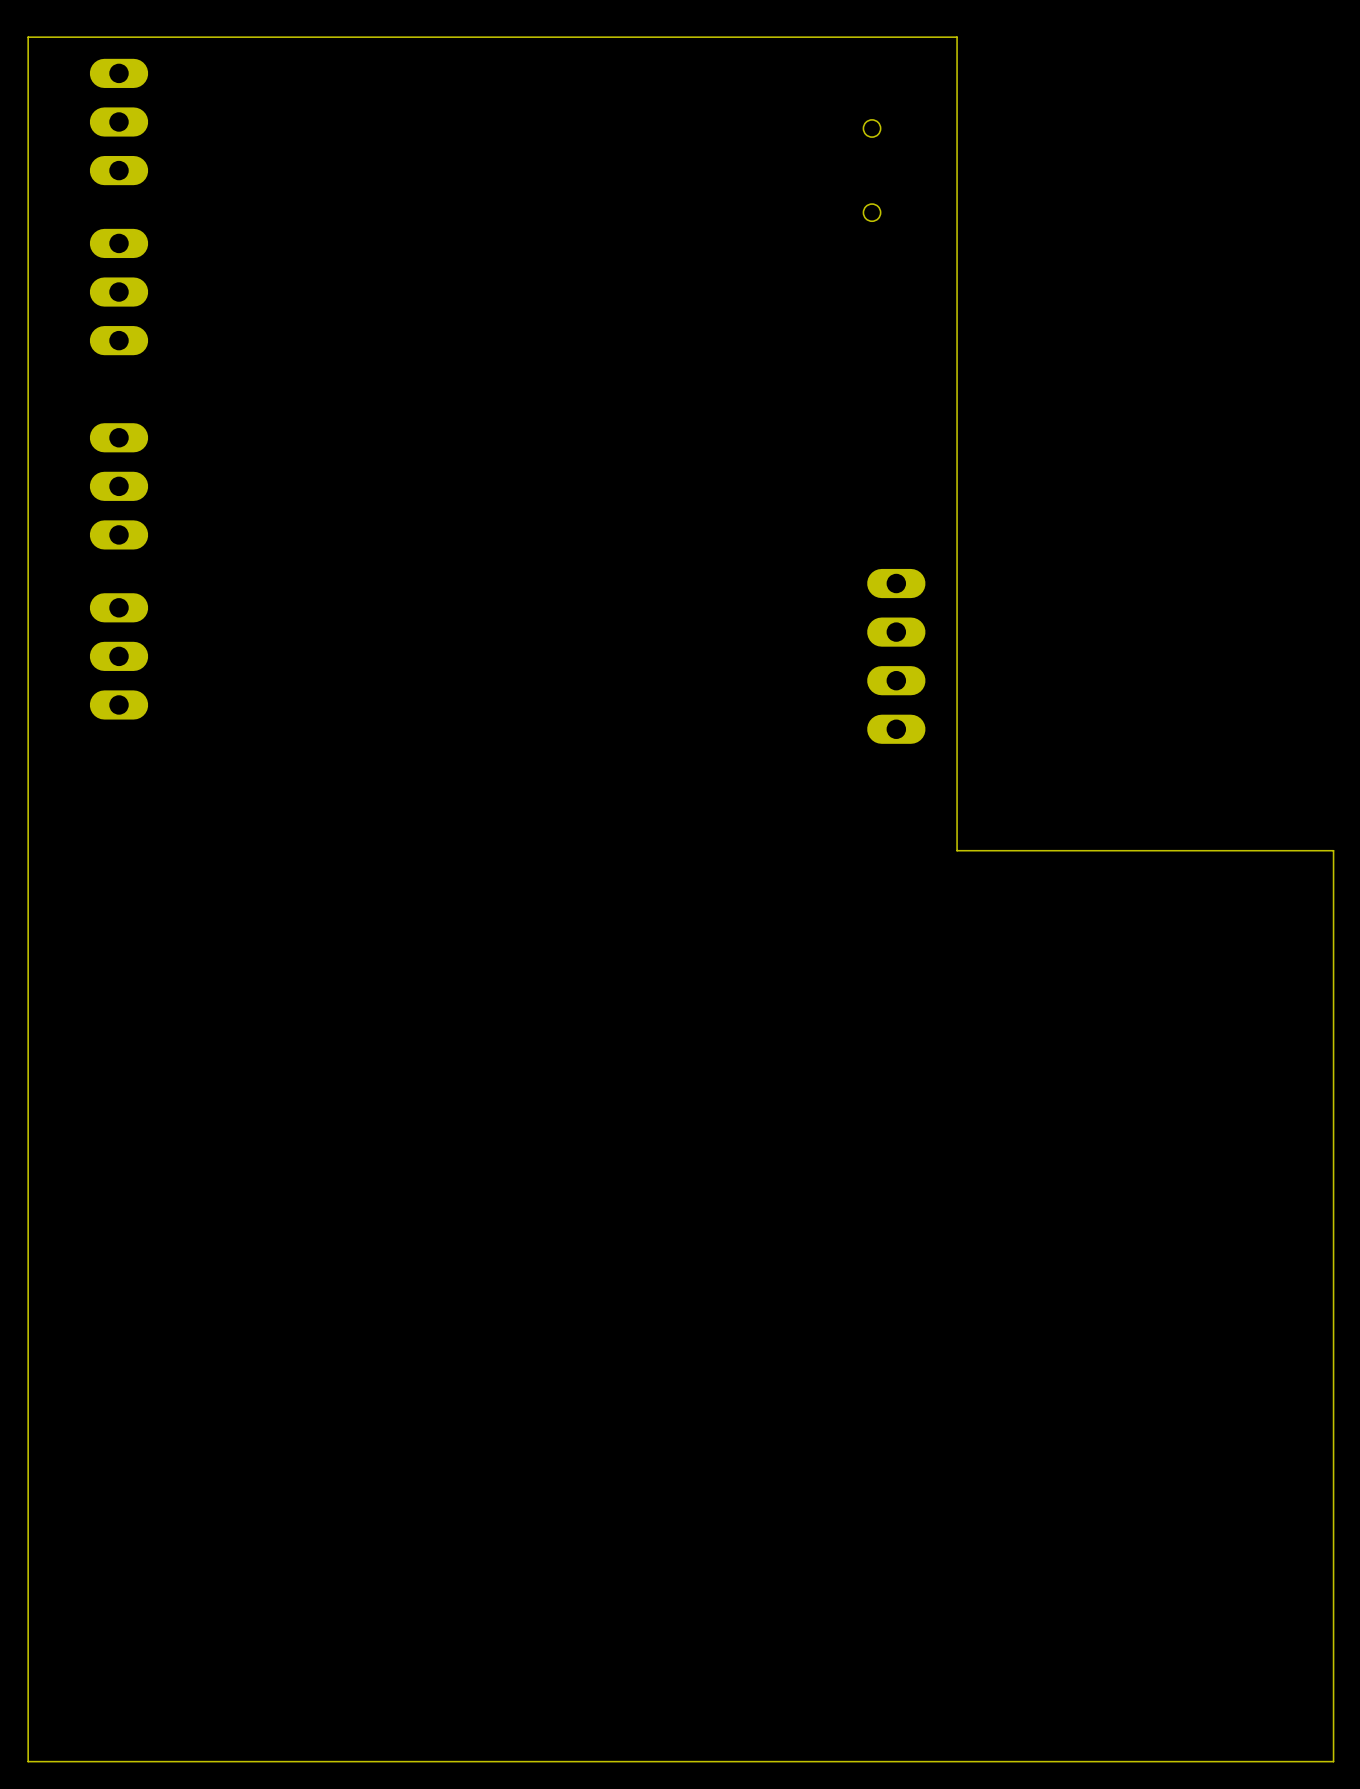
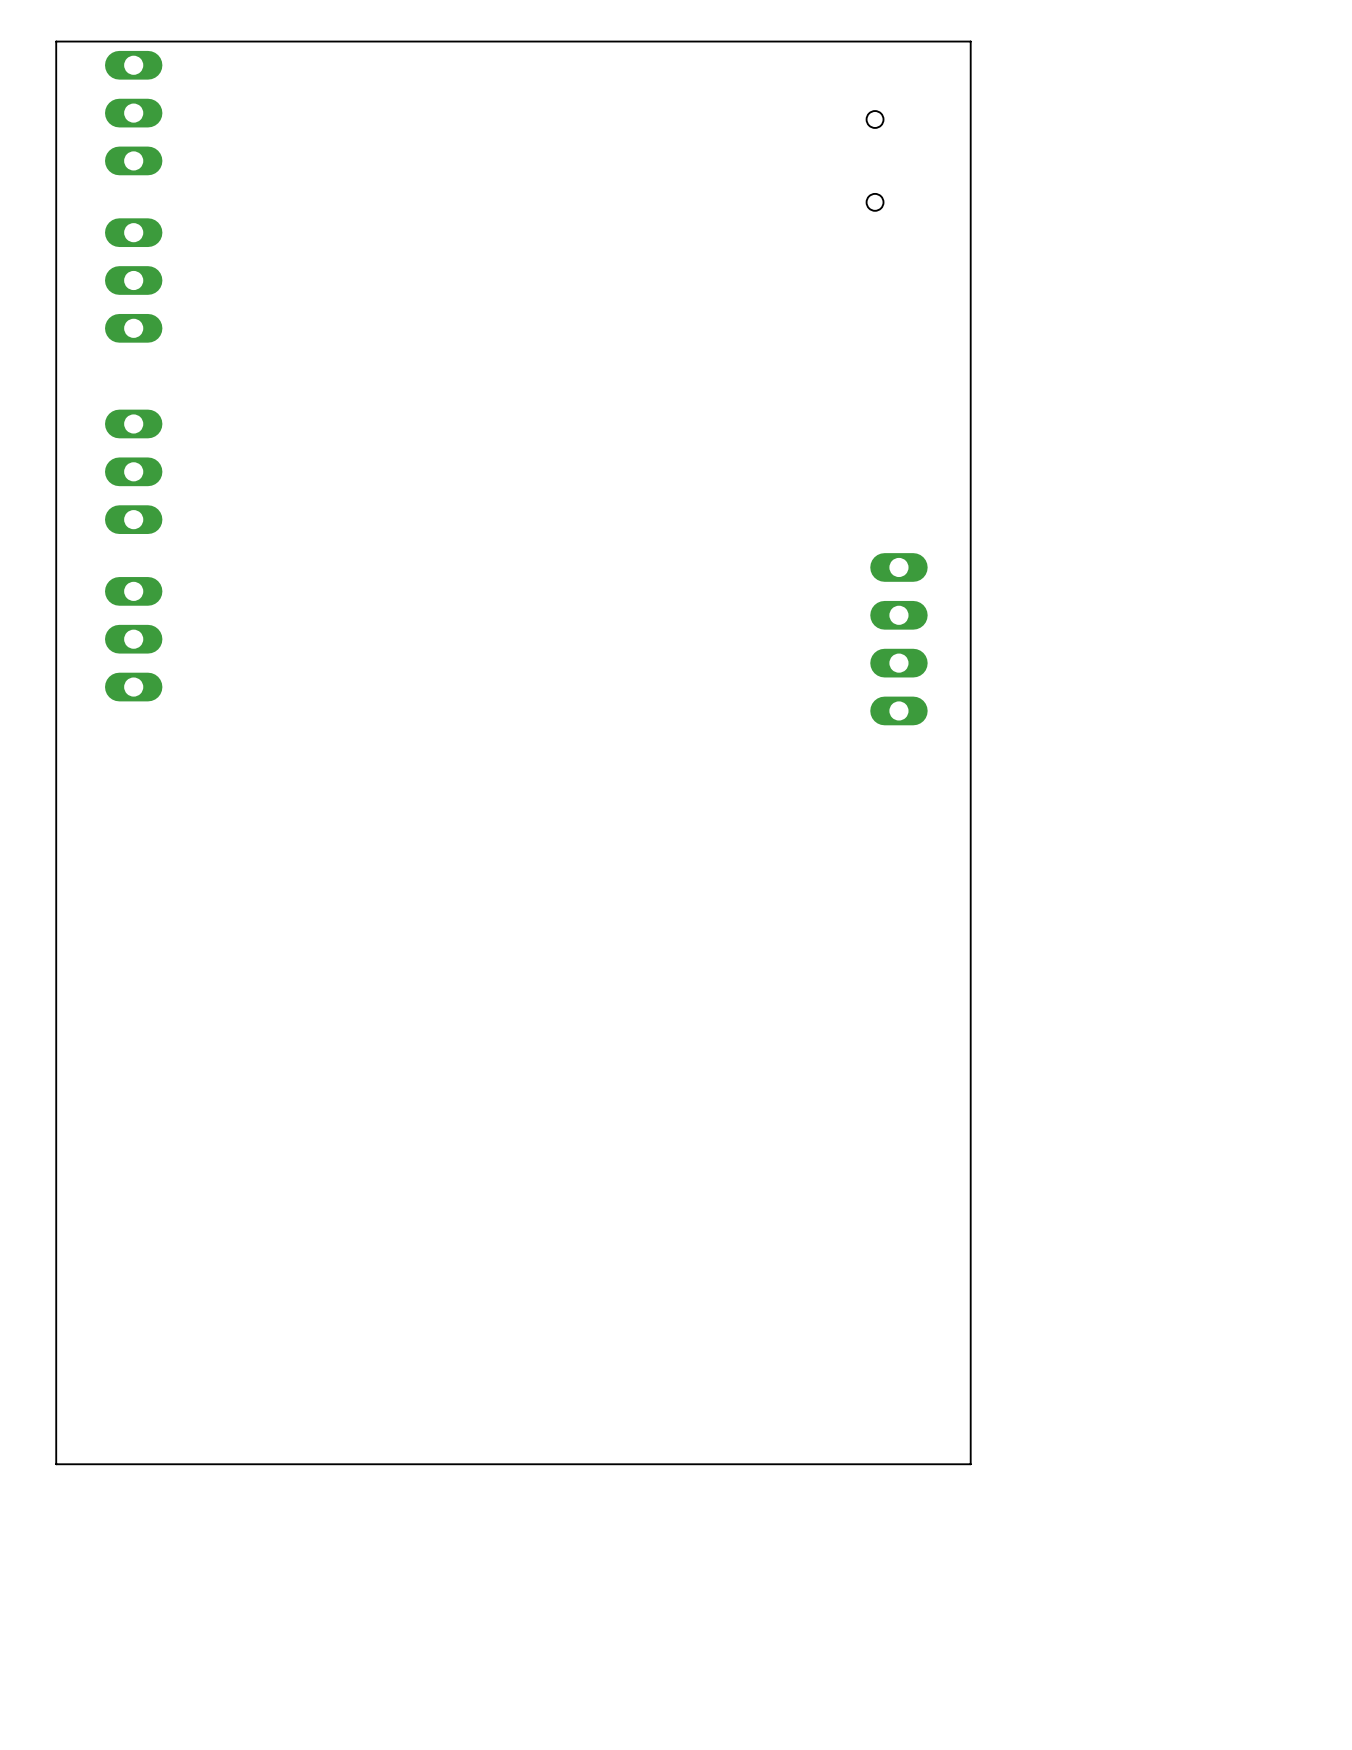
board edge: (957, 37) (28, 37) (28, 1761) (1333, 1761) (1333, 850) (957, 850) (957, 37) -> (970, 41) (970, 1464) (56, 1464) (56, 41) (970, 41)

